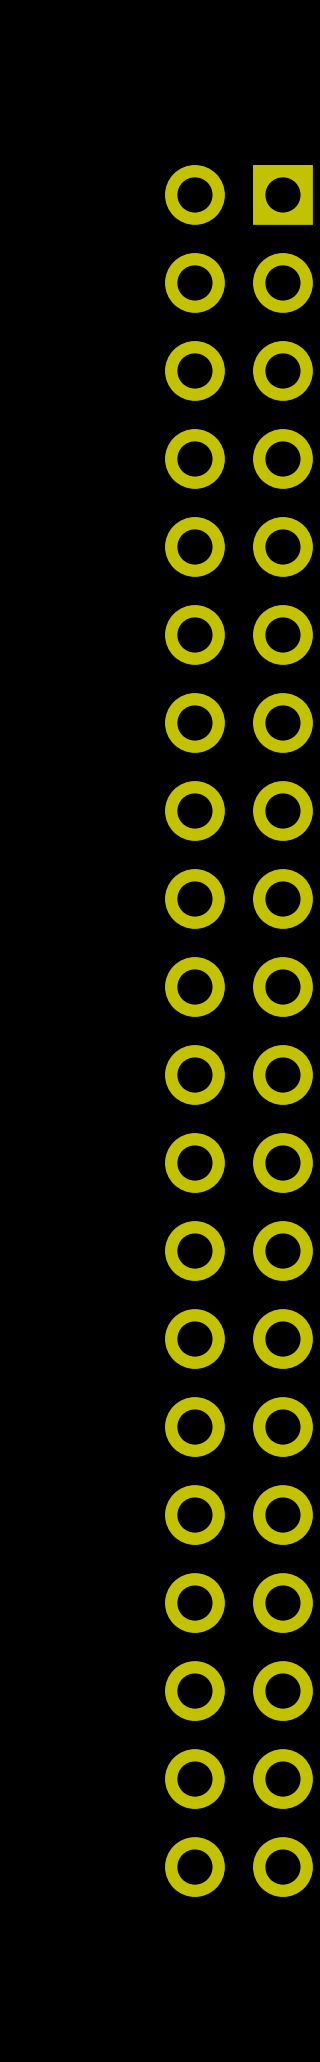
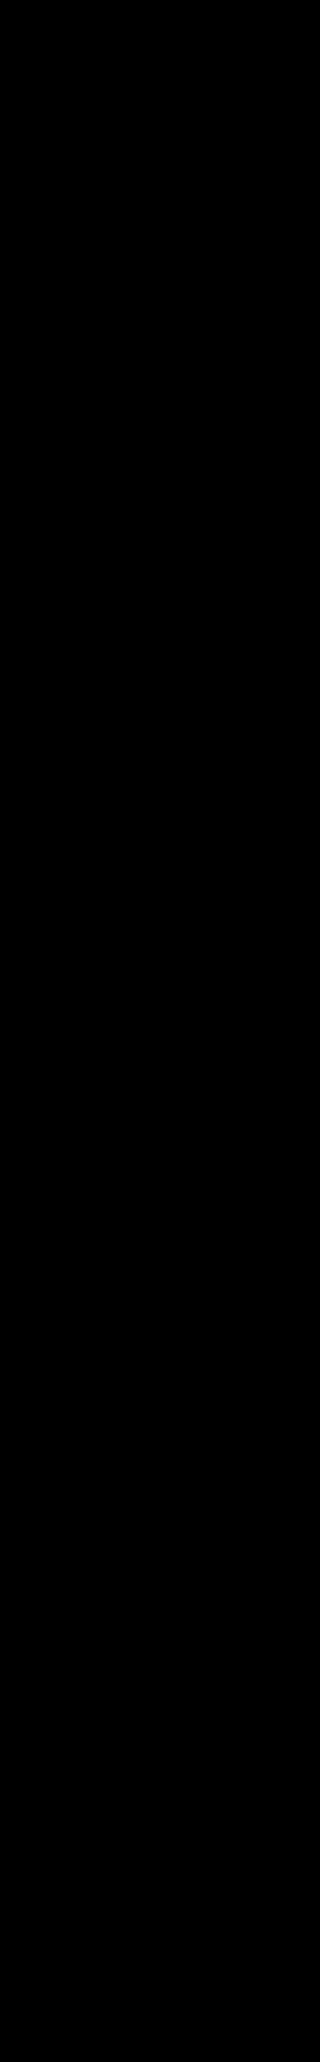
part: (238, 1030) -> none

